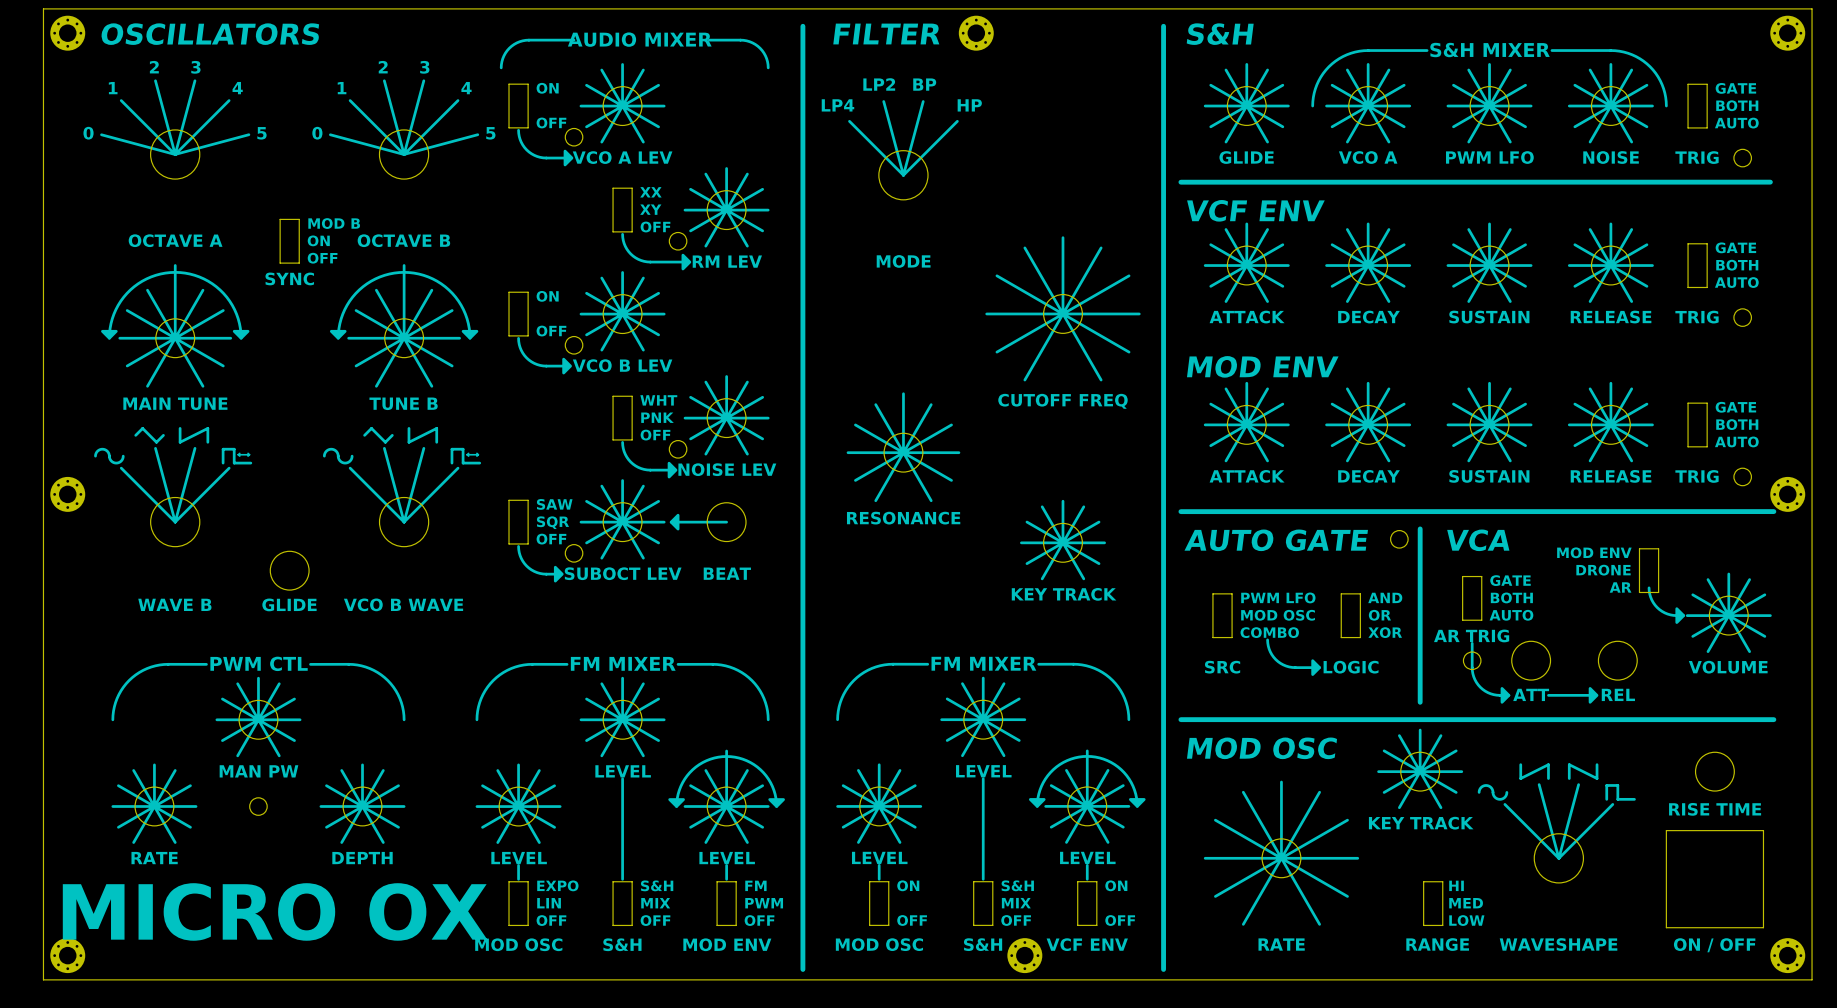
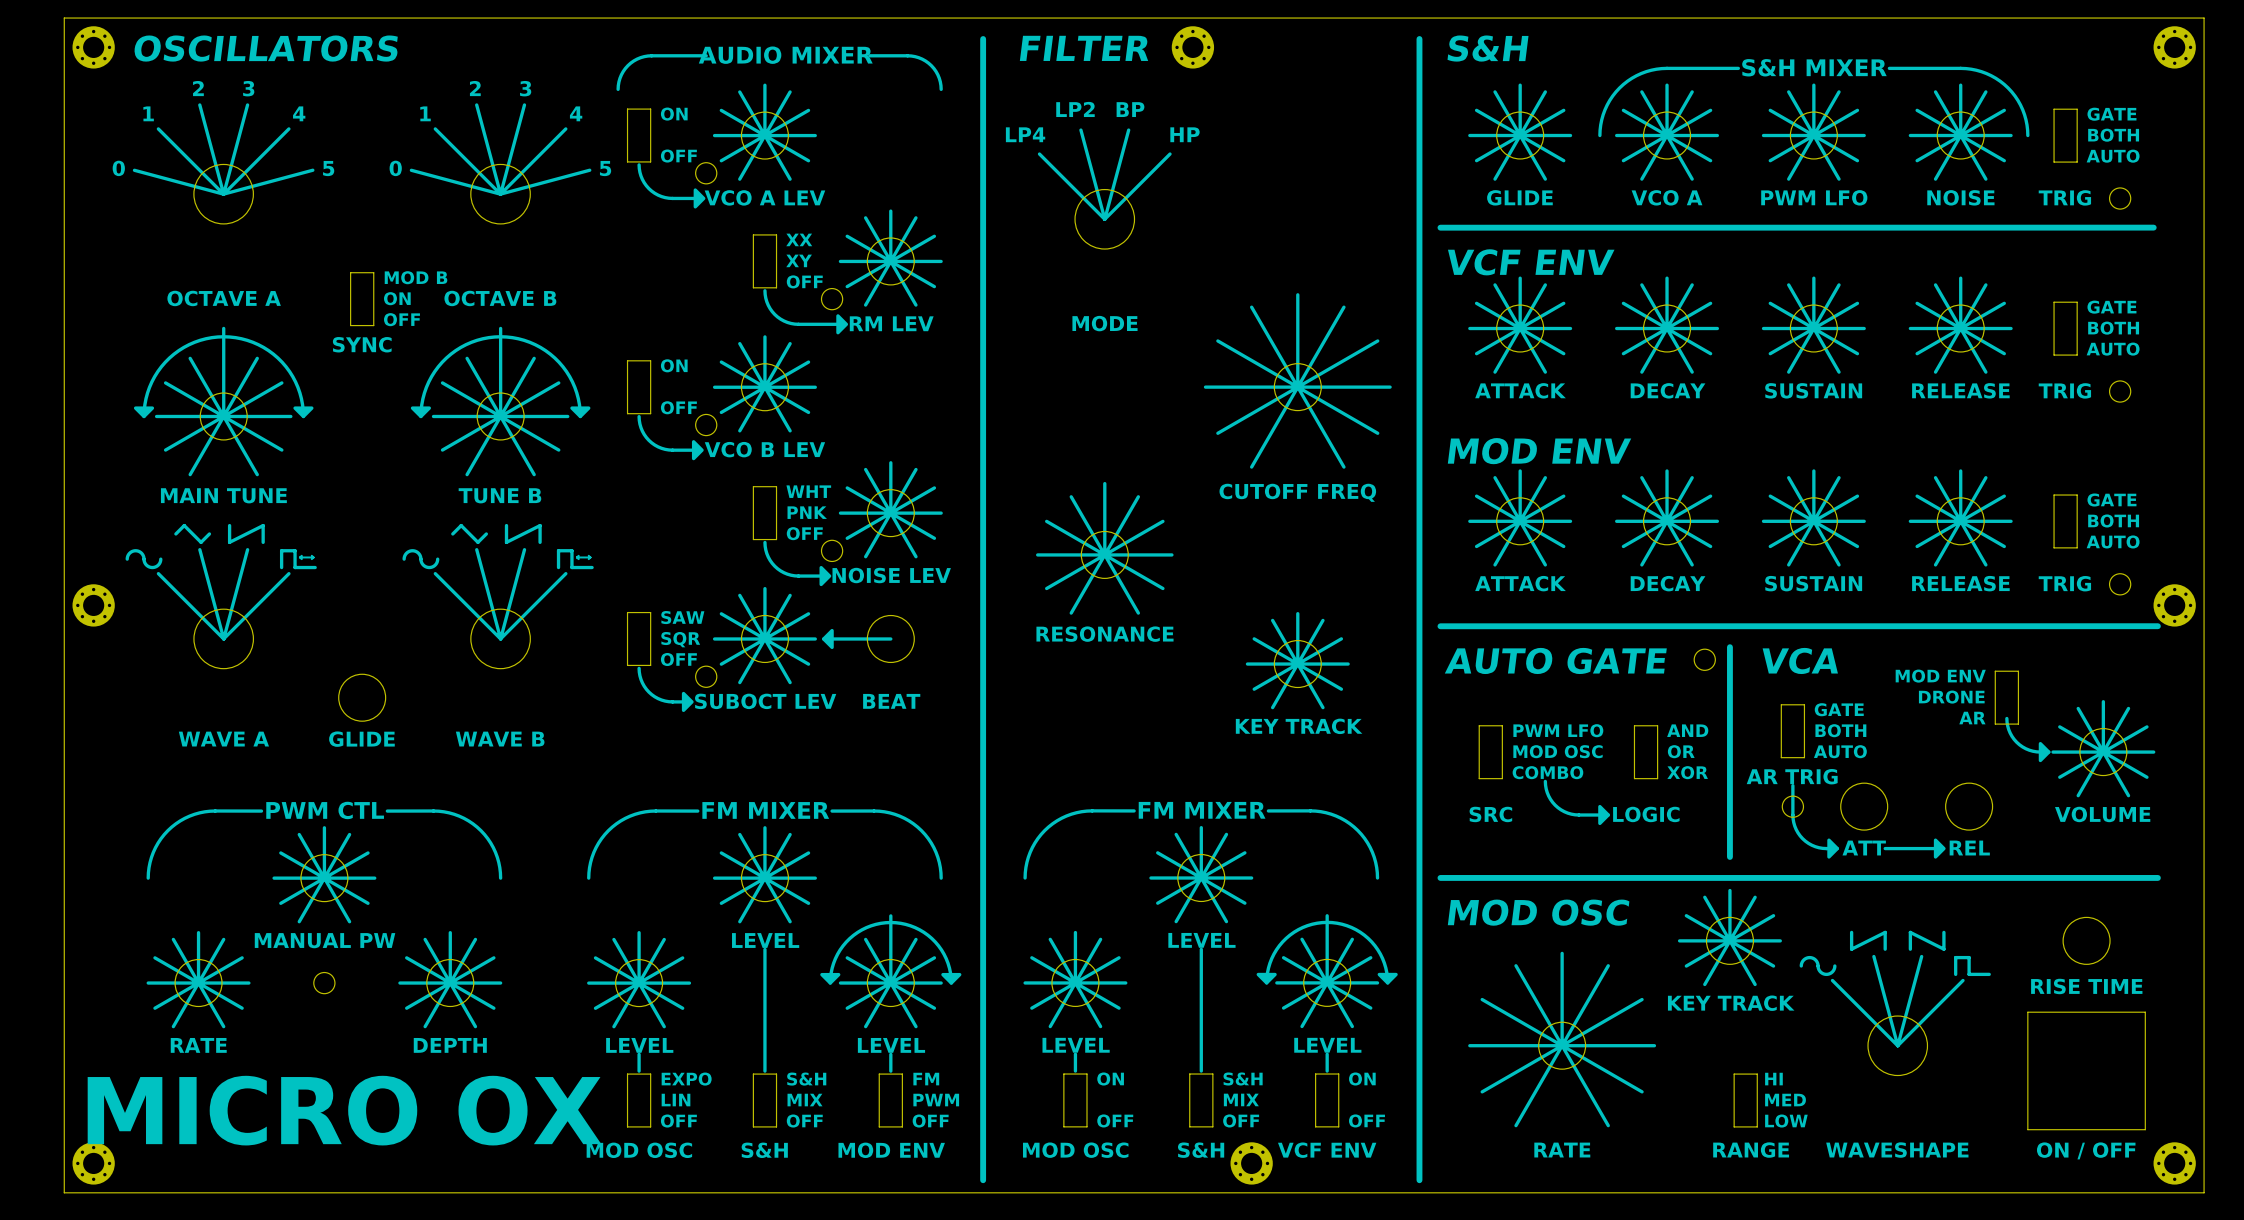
text: WAVE B (174, 604) -> WAVE A (223, 739)
text: VCO B WAVE (403, 604) -> WAVE B (500, 739)
text: MAN PW (258, 771) -> MANUAL PW (325, 940)

